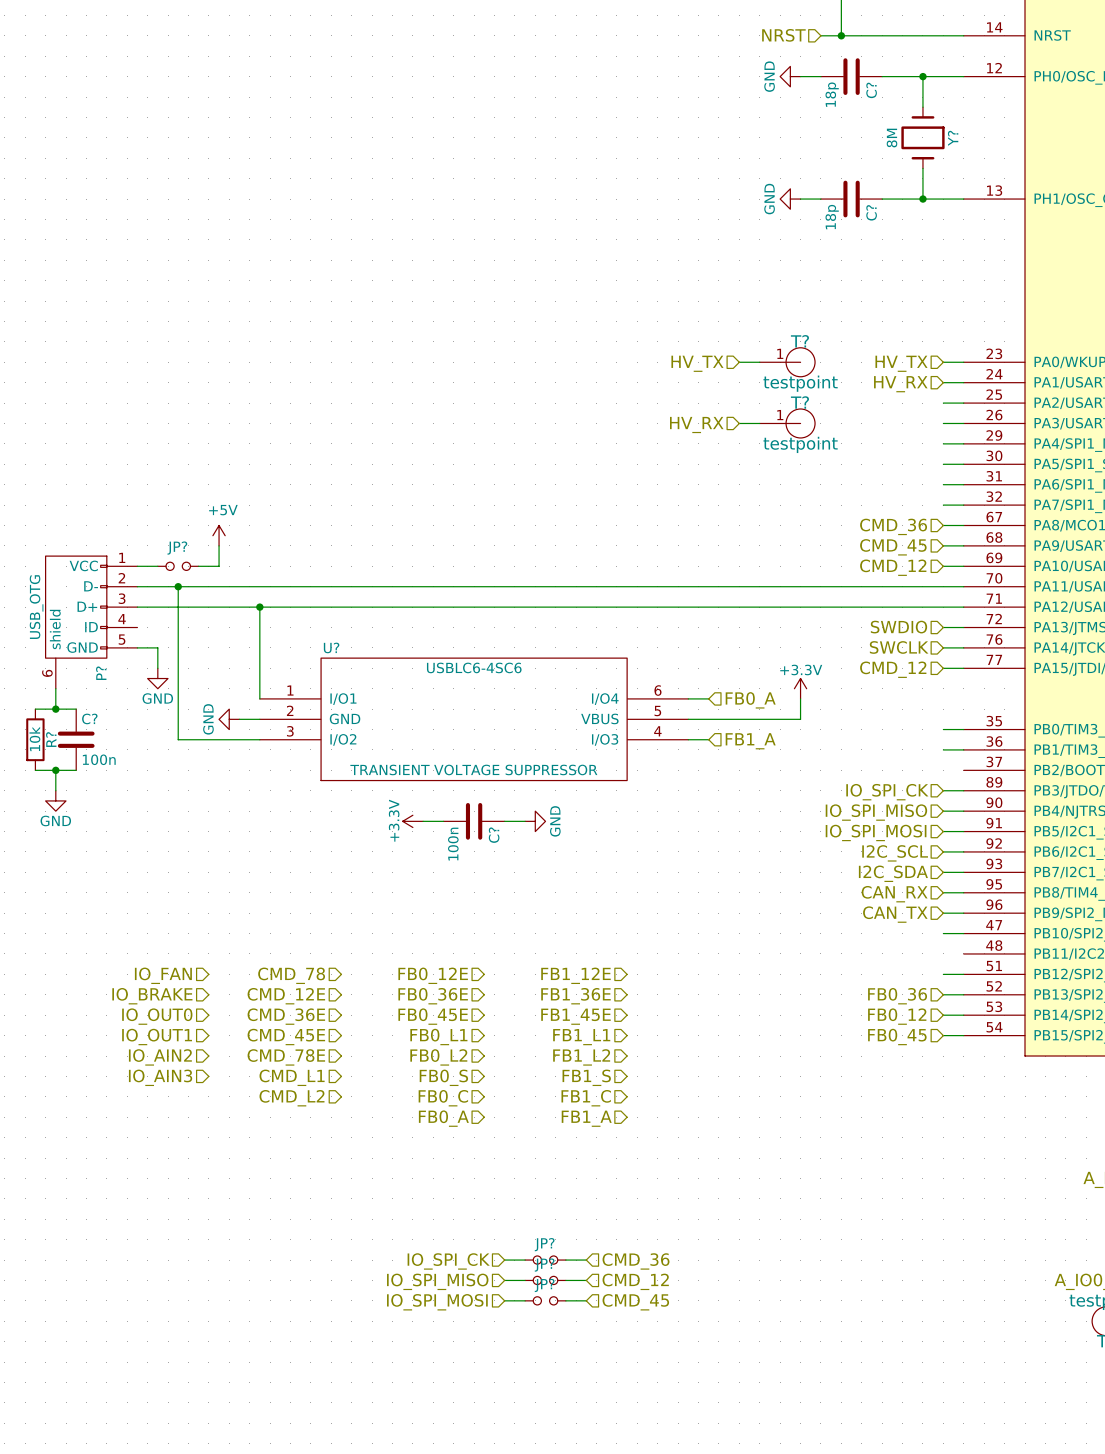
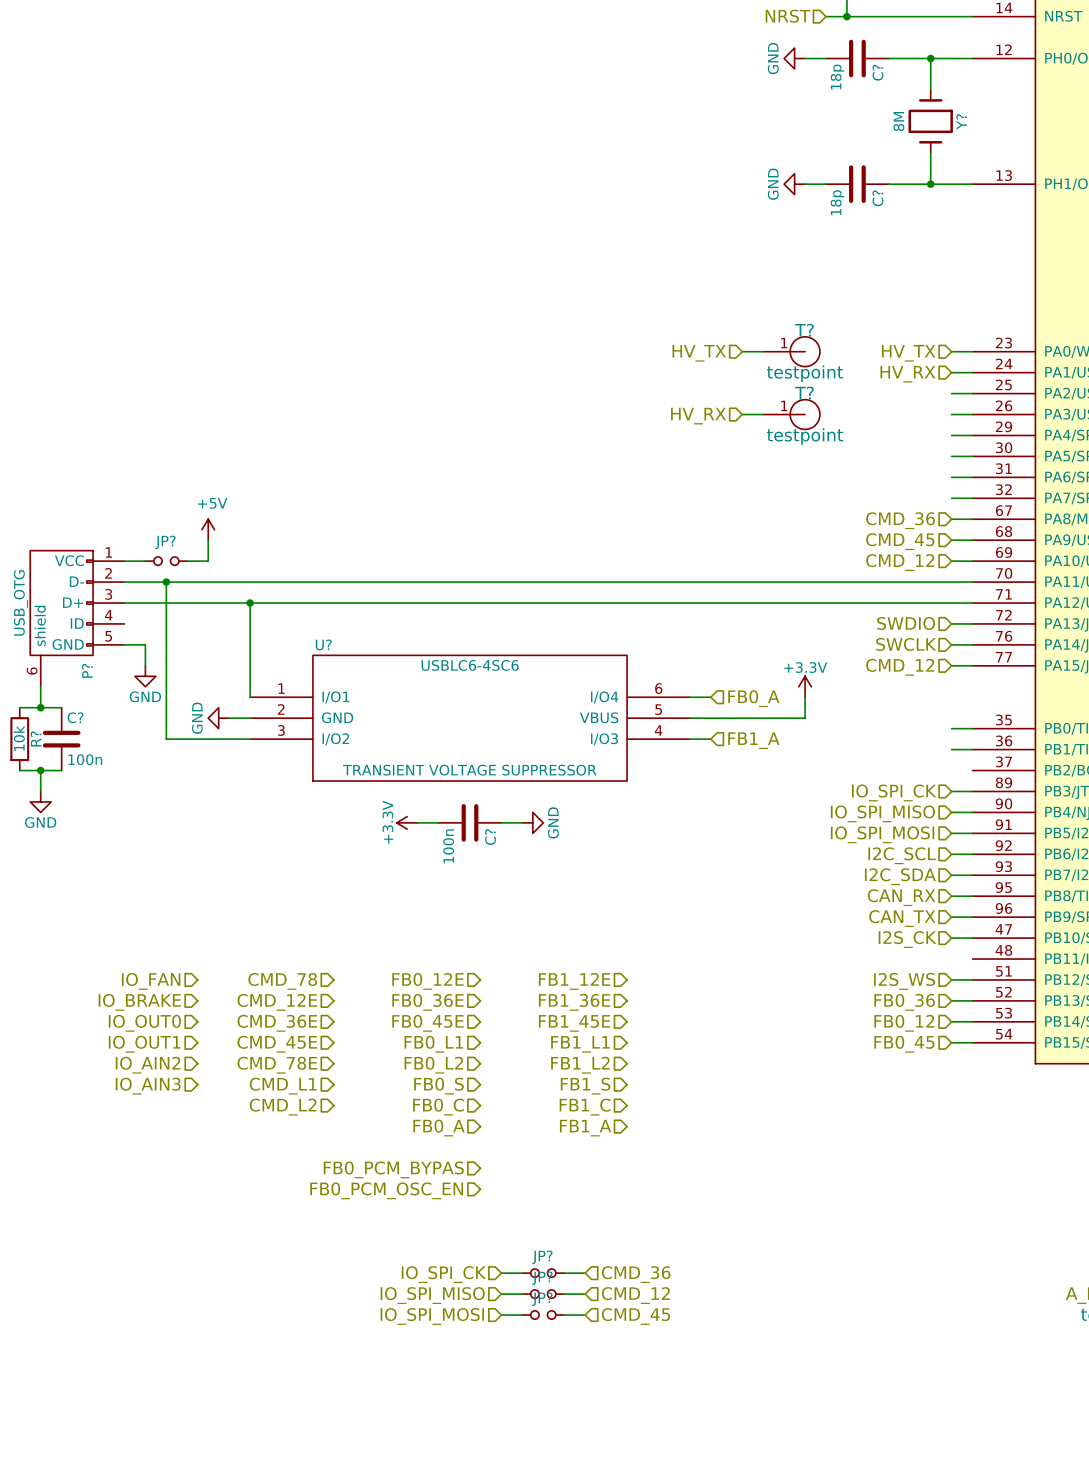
hierarchical label: none -> I2S_CK (907, 939)
hierarchical label: none -> I2S_WS (904, 981)
hierarchical label: none -> FB0_PCM_BYPAS (393, 1169)
hierarchical label: none -> FB0_PCM_OSC_EN (386, 1190)

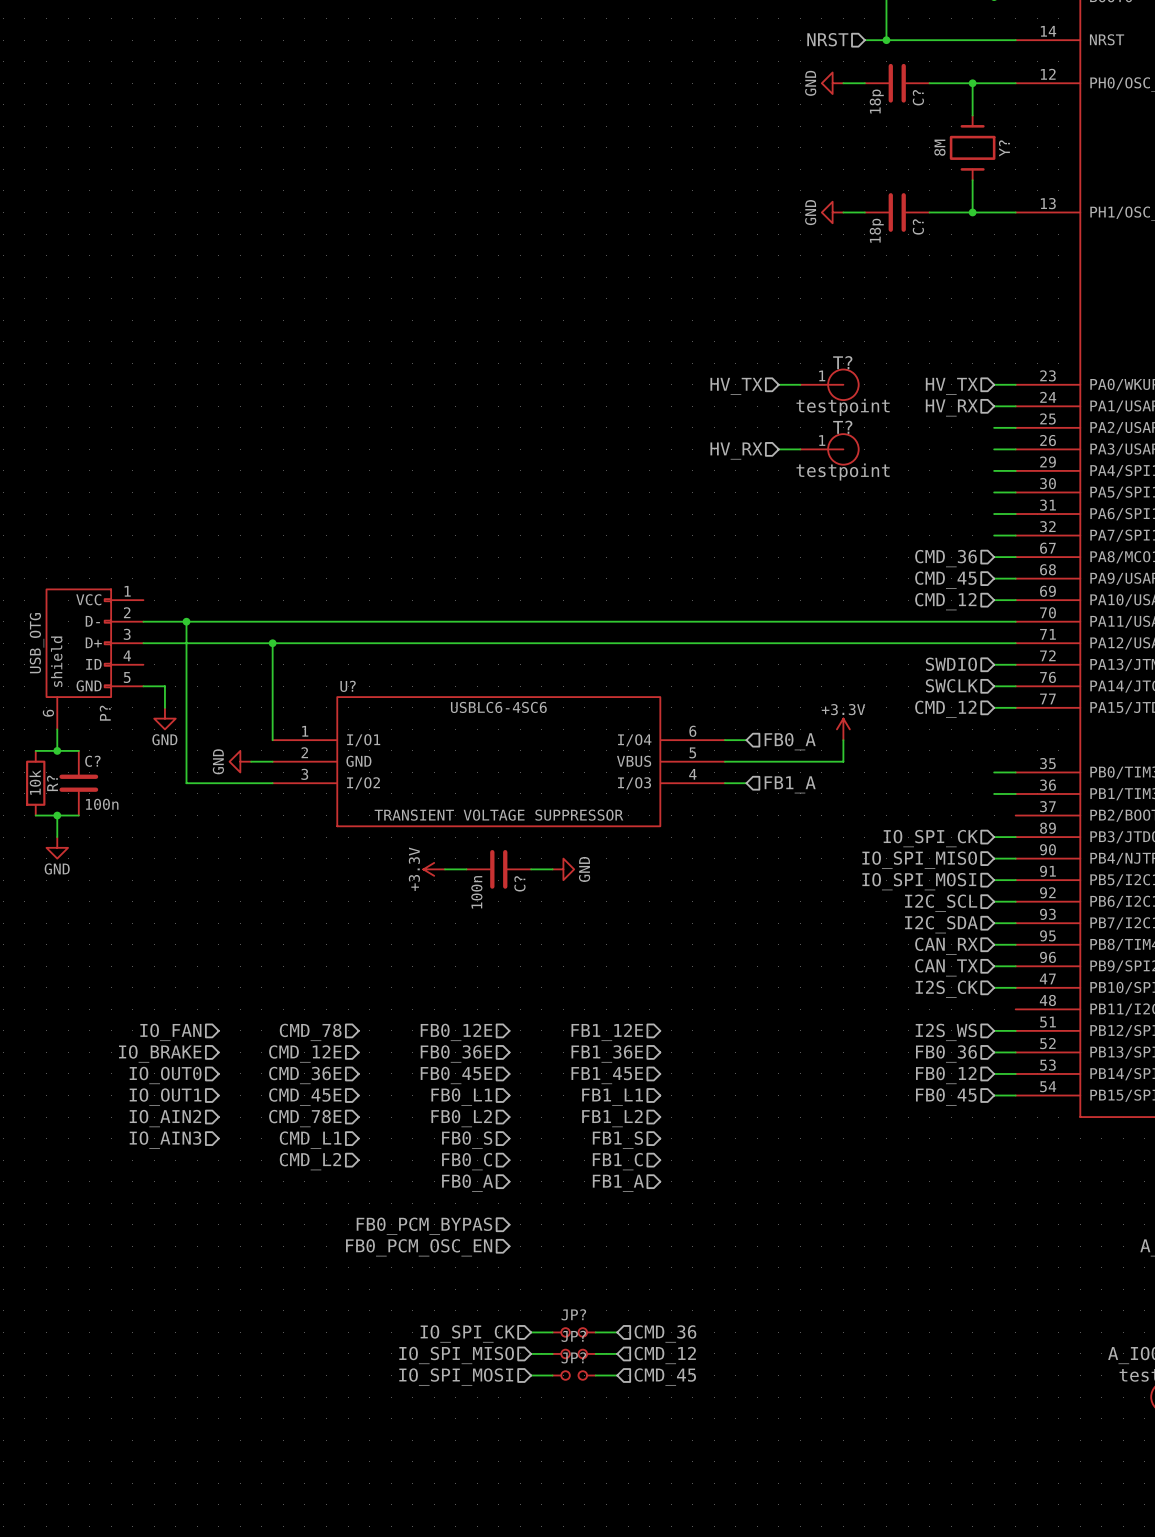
power symbol: +5V (208, 529) -> none
wire: (208, 540) (208, 561) (187, 561) -> none
wire: (124, 561) (145, 561) -> none
JP?: (166, 561) -> none

